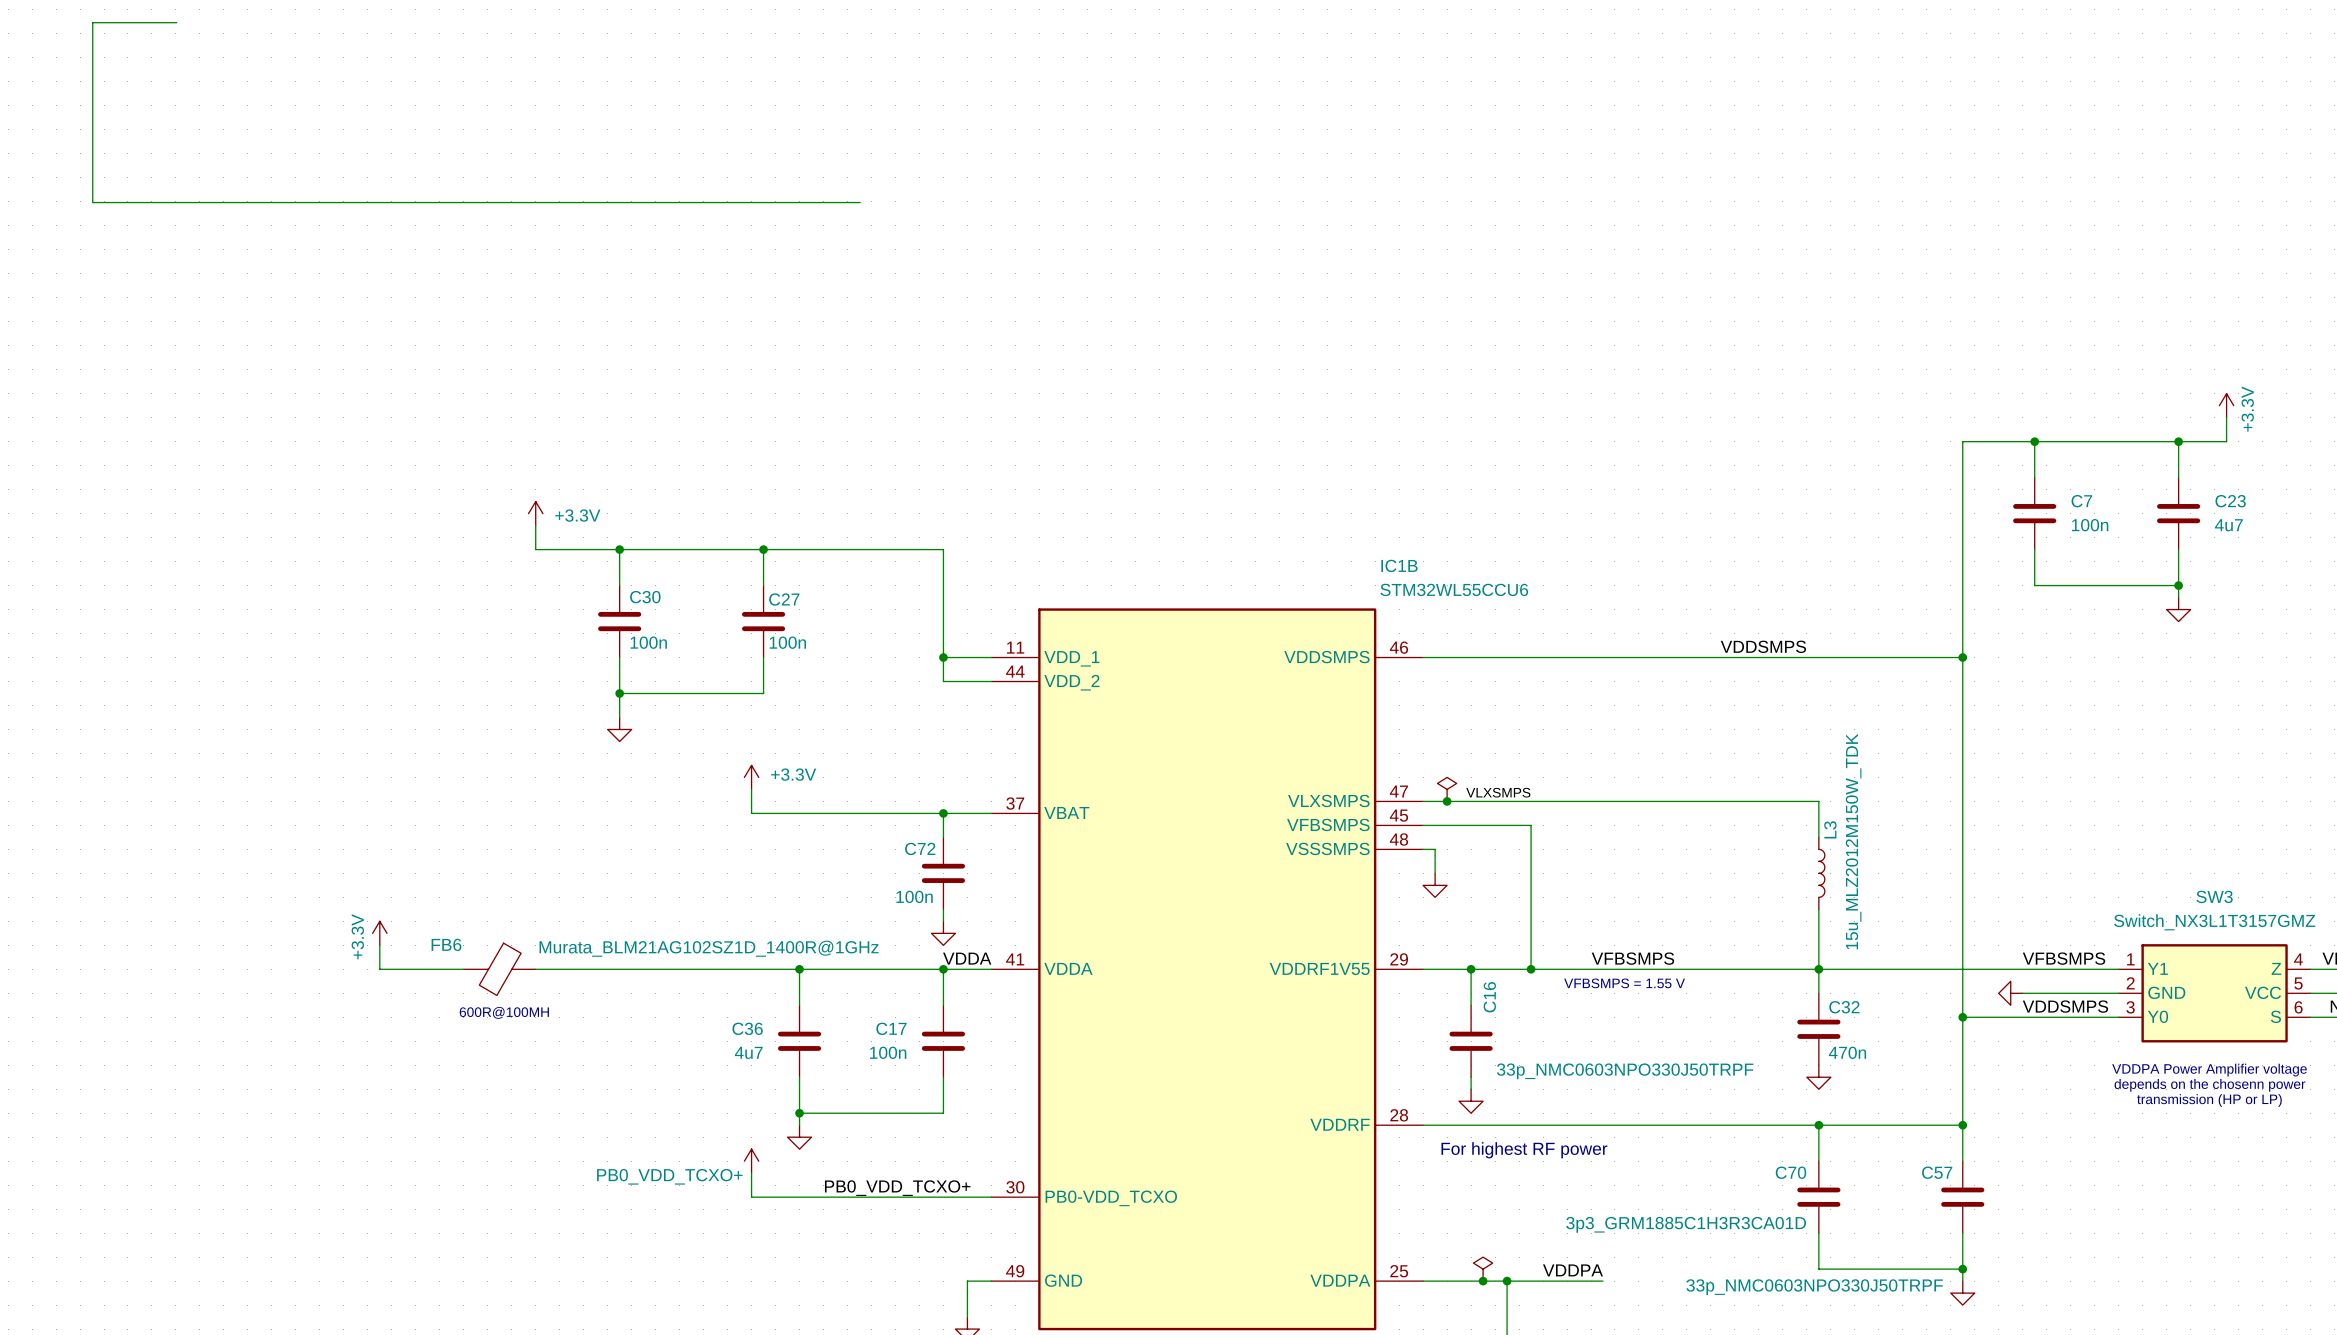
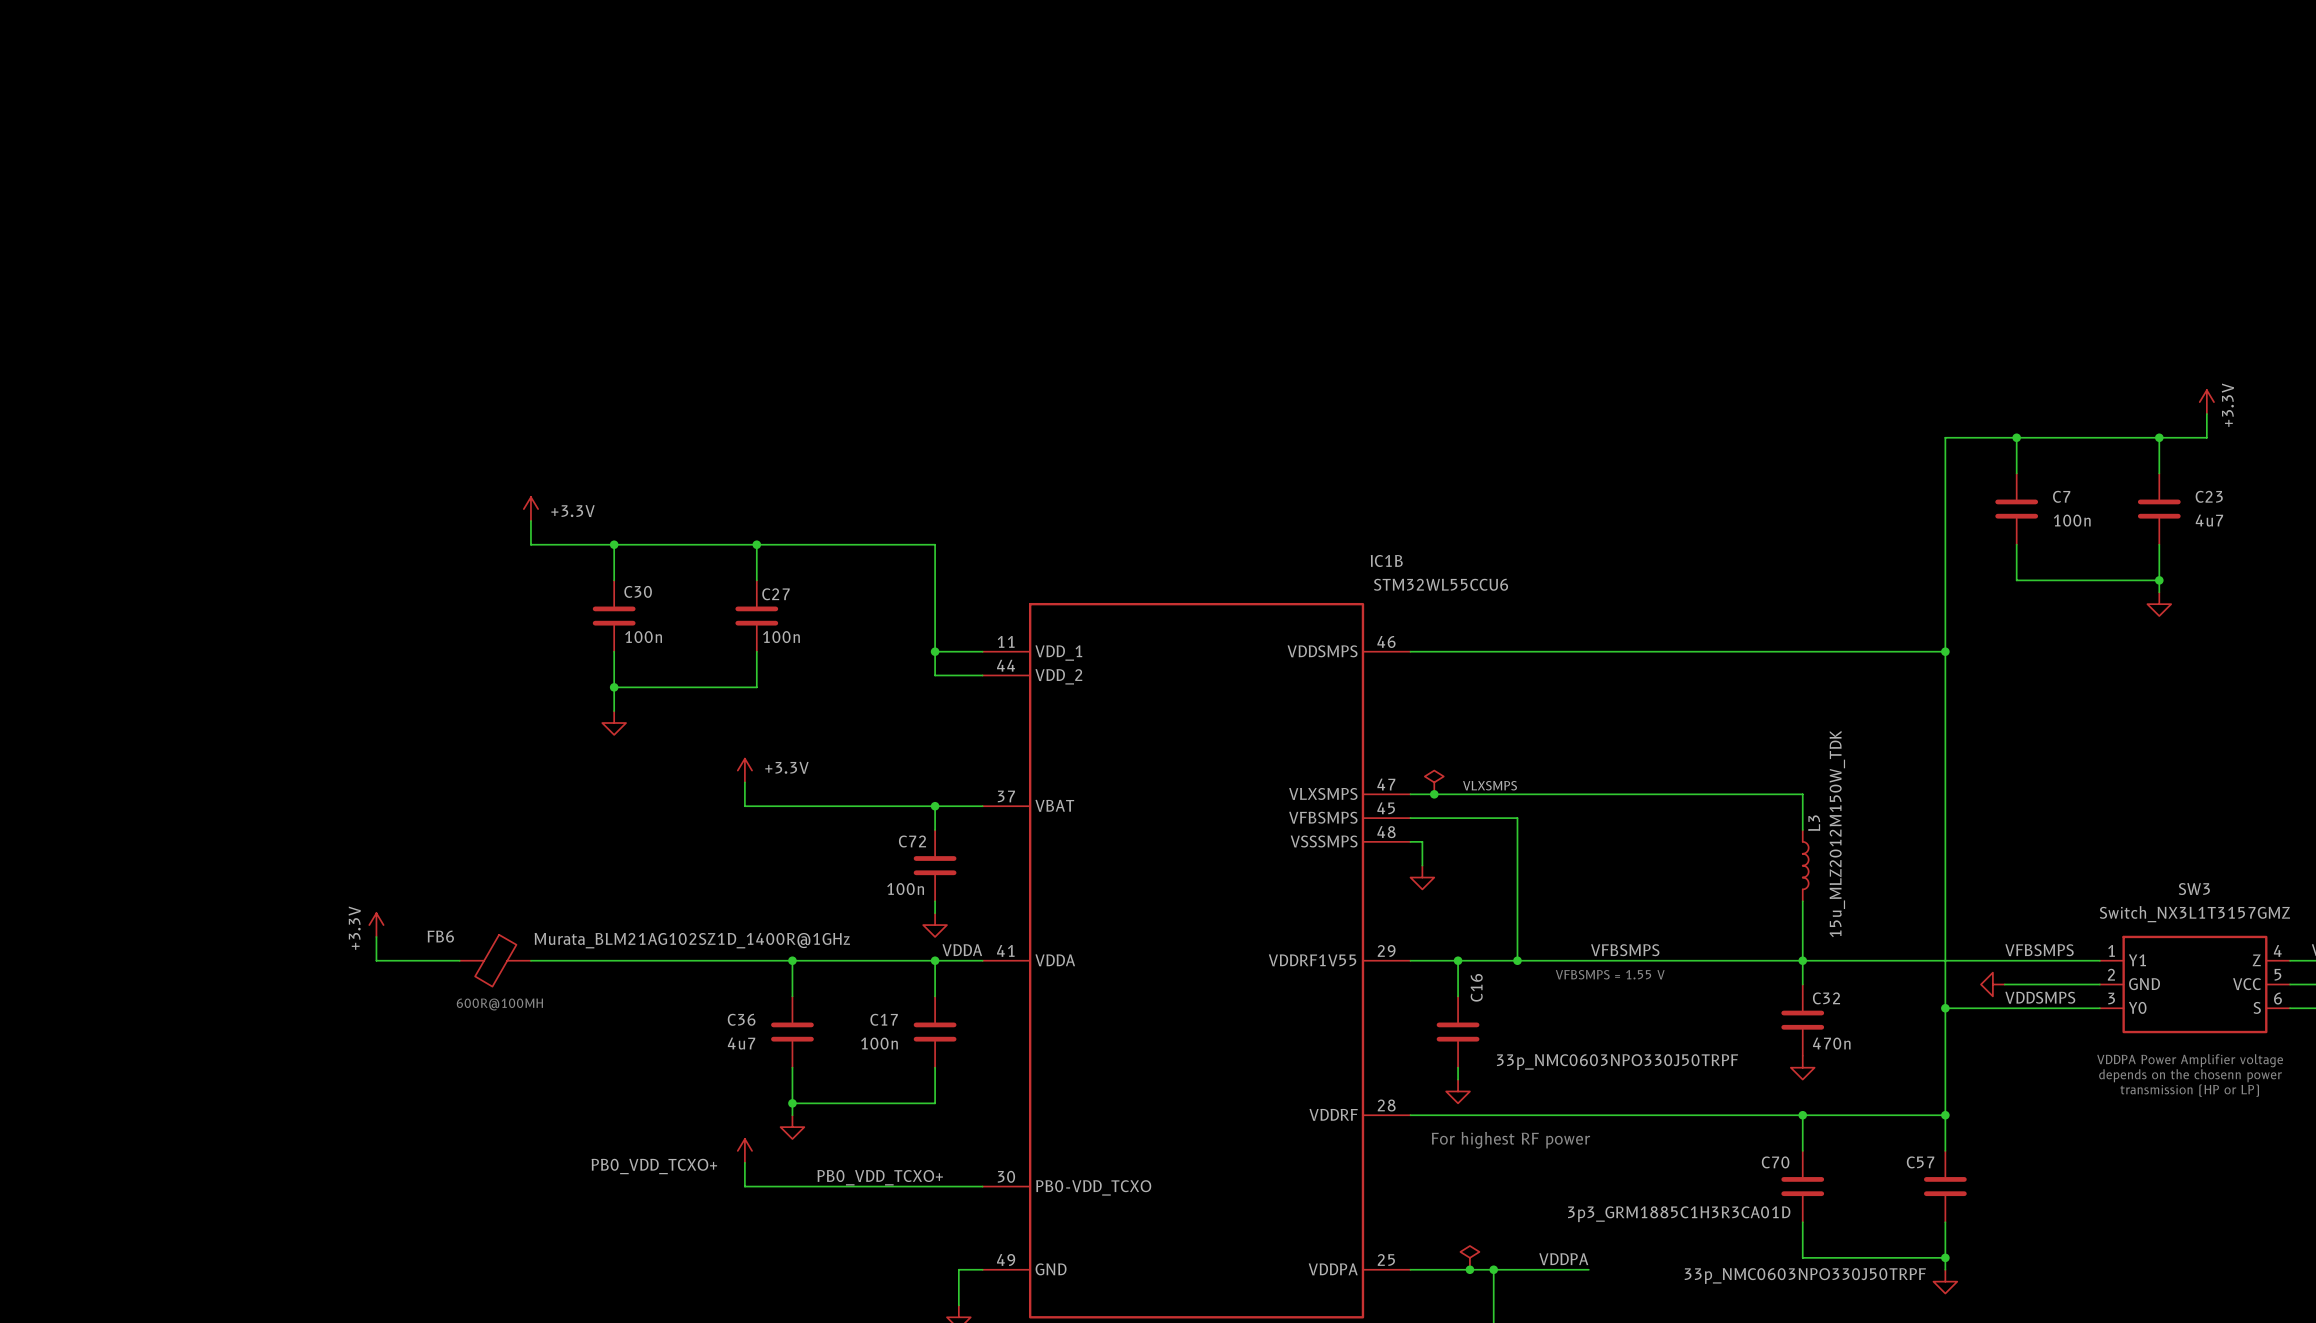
wire: (176, 22) (92, 22) (92, 202) (860, 202) -> none
label: VDDSMPS (1763, 646) -> none

